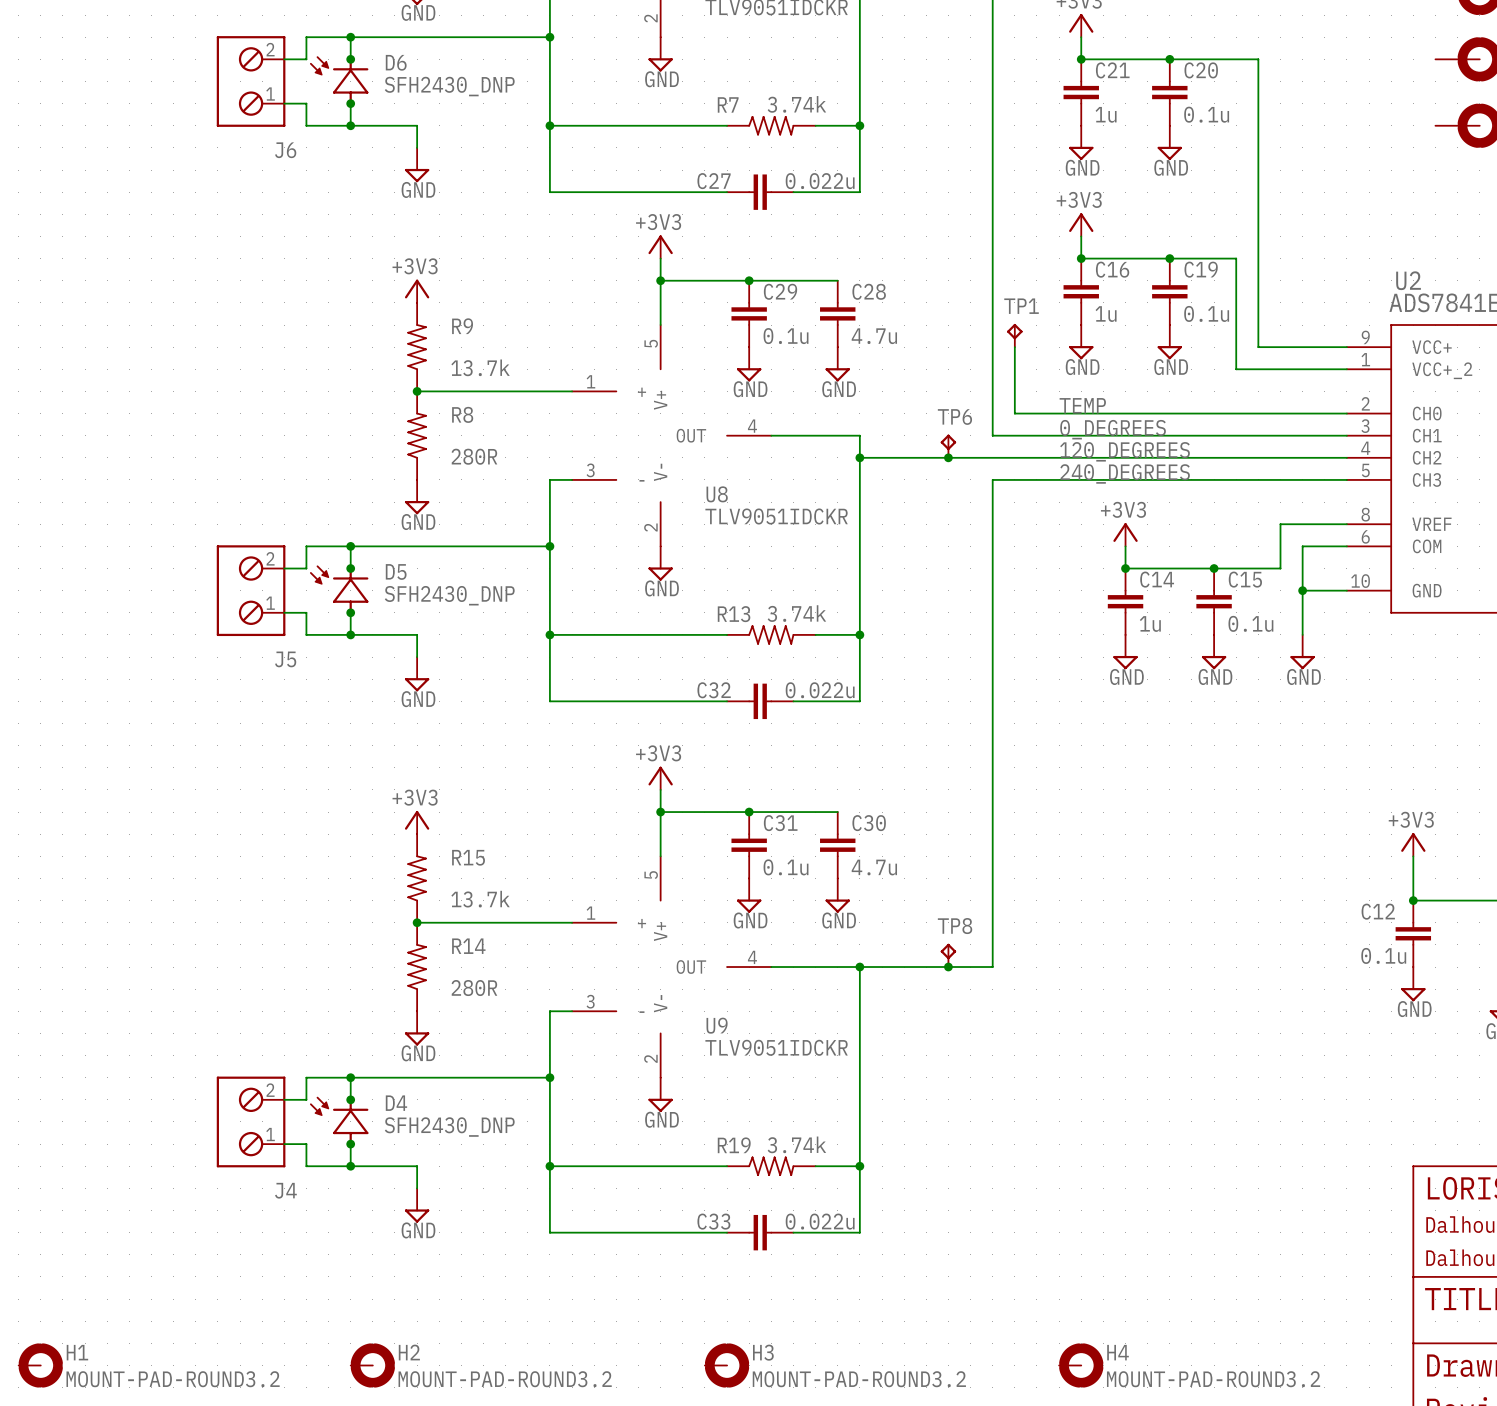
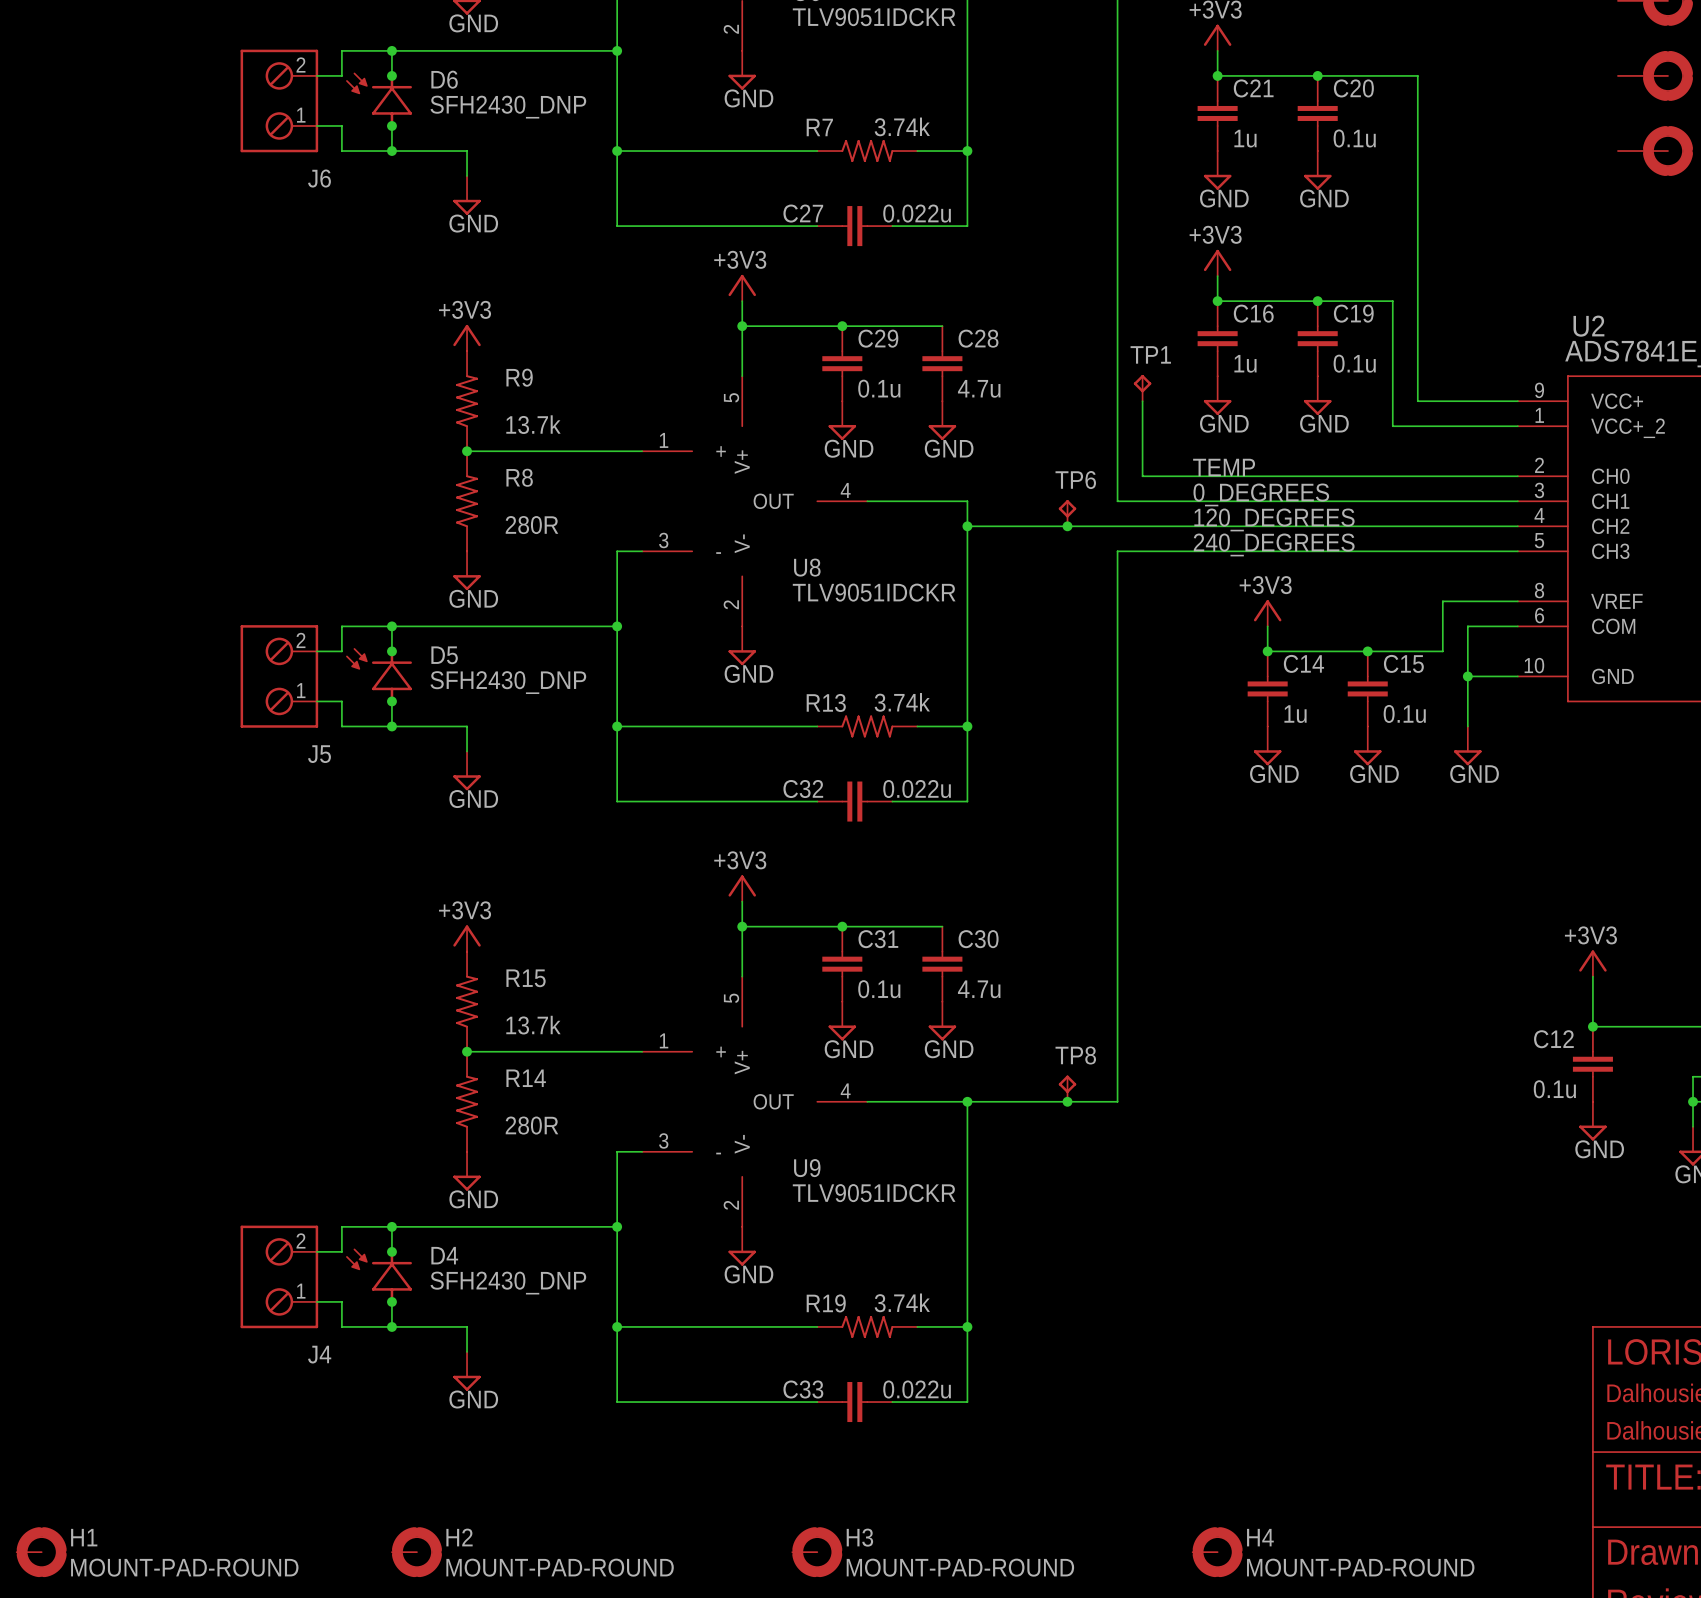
H1 value: MOUNT-PAD-ROUND3.2 (173, 1379) -> MOUNT-PAD-ROUND (184, 1567)
H2 value: MOUNT-PAD-ROUND3.2 (505, 1379) -> MOUNT-PAD-ROUND (560, 1567)
H3 value: MOUNT-PAD-ROUND3.2 (859, 1379) -> MOUNT-PAD-ROUND (960, 1567)
H4 value: MOUNT-PAD-ROUND3.2 (1213, 1379) -> MOUNT-PAD-ROUND (1360, 1567)

